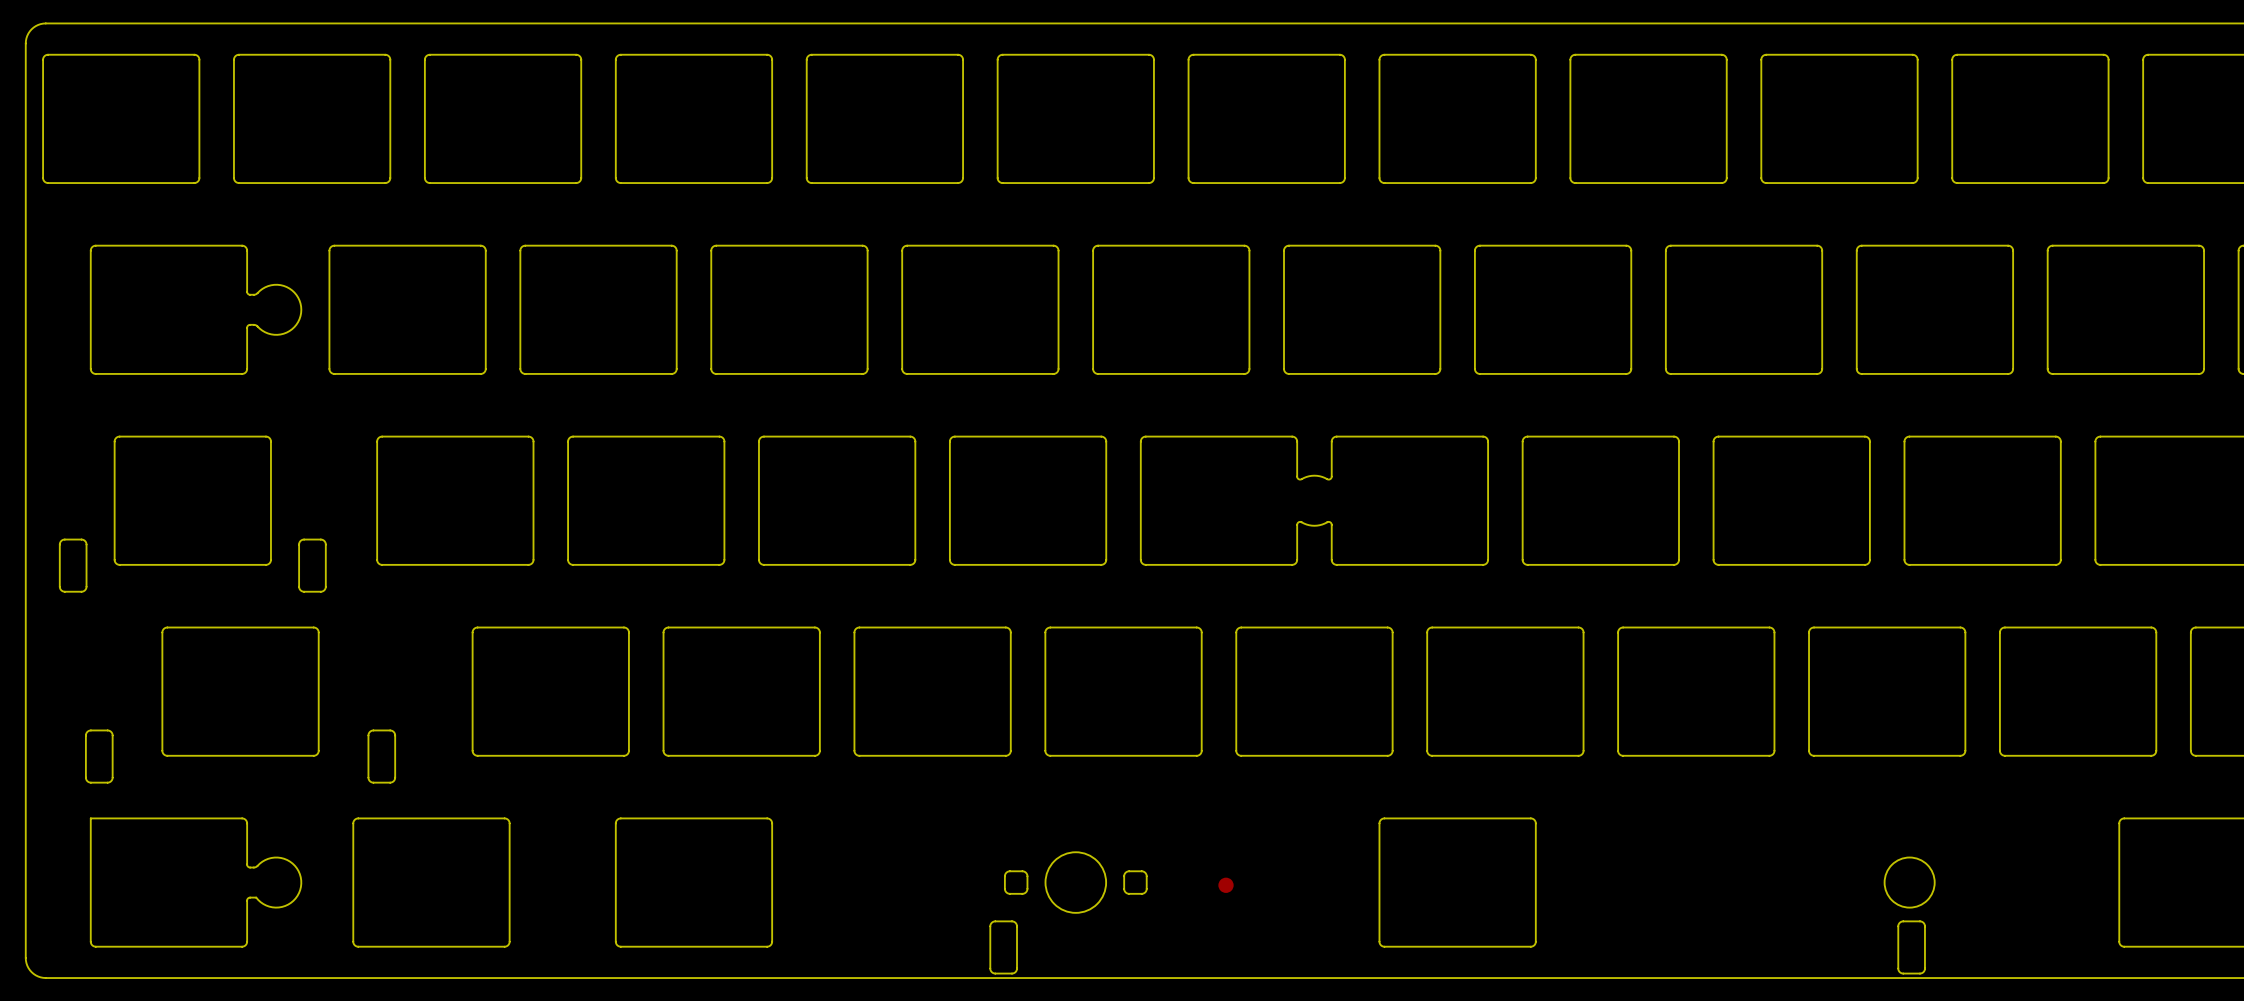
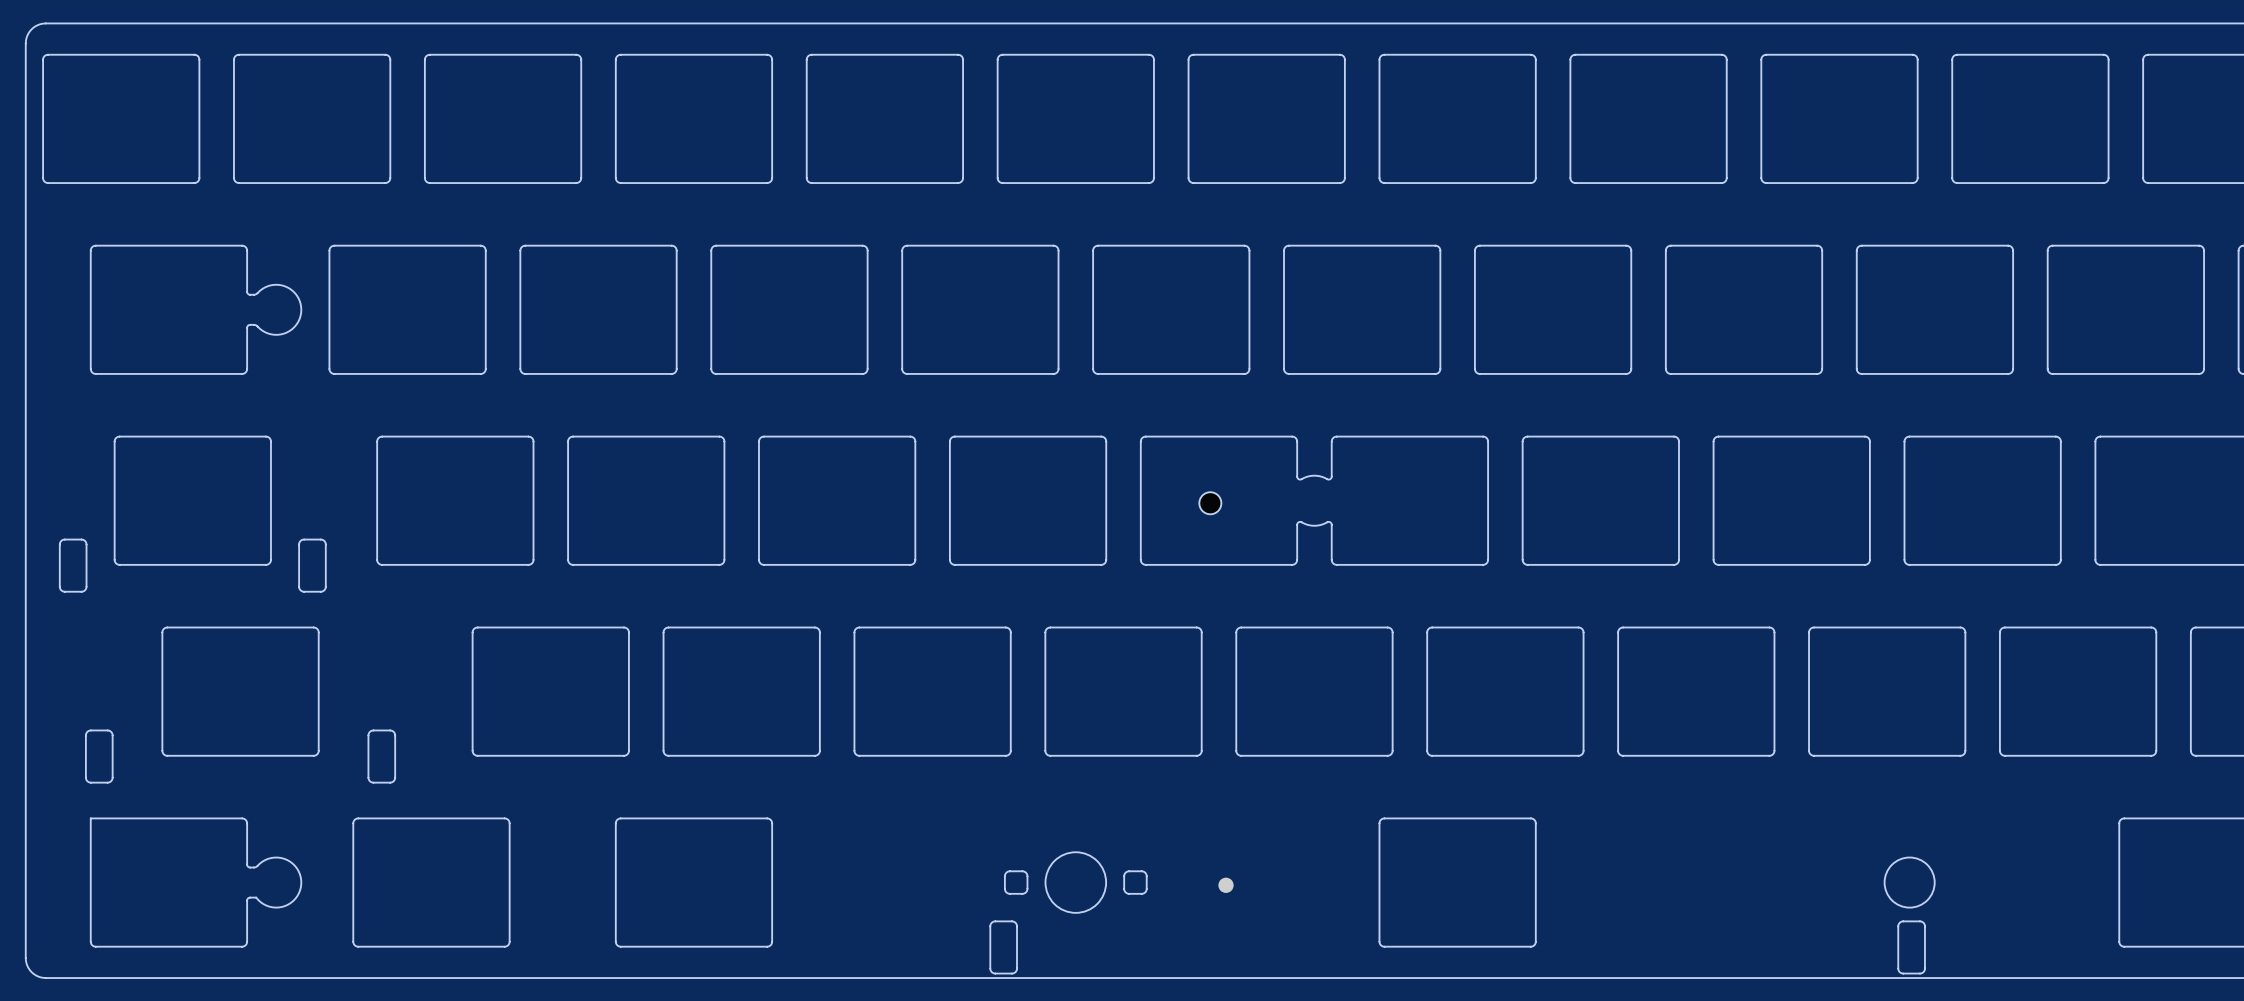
part: none -> (1210, 503)

